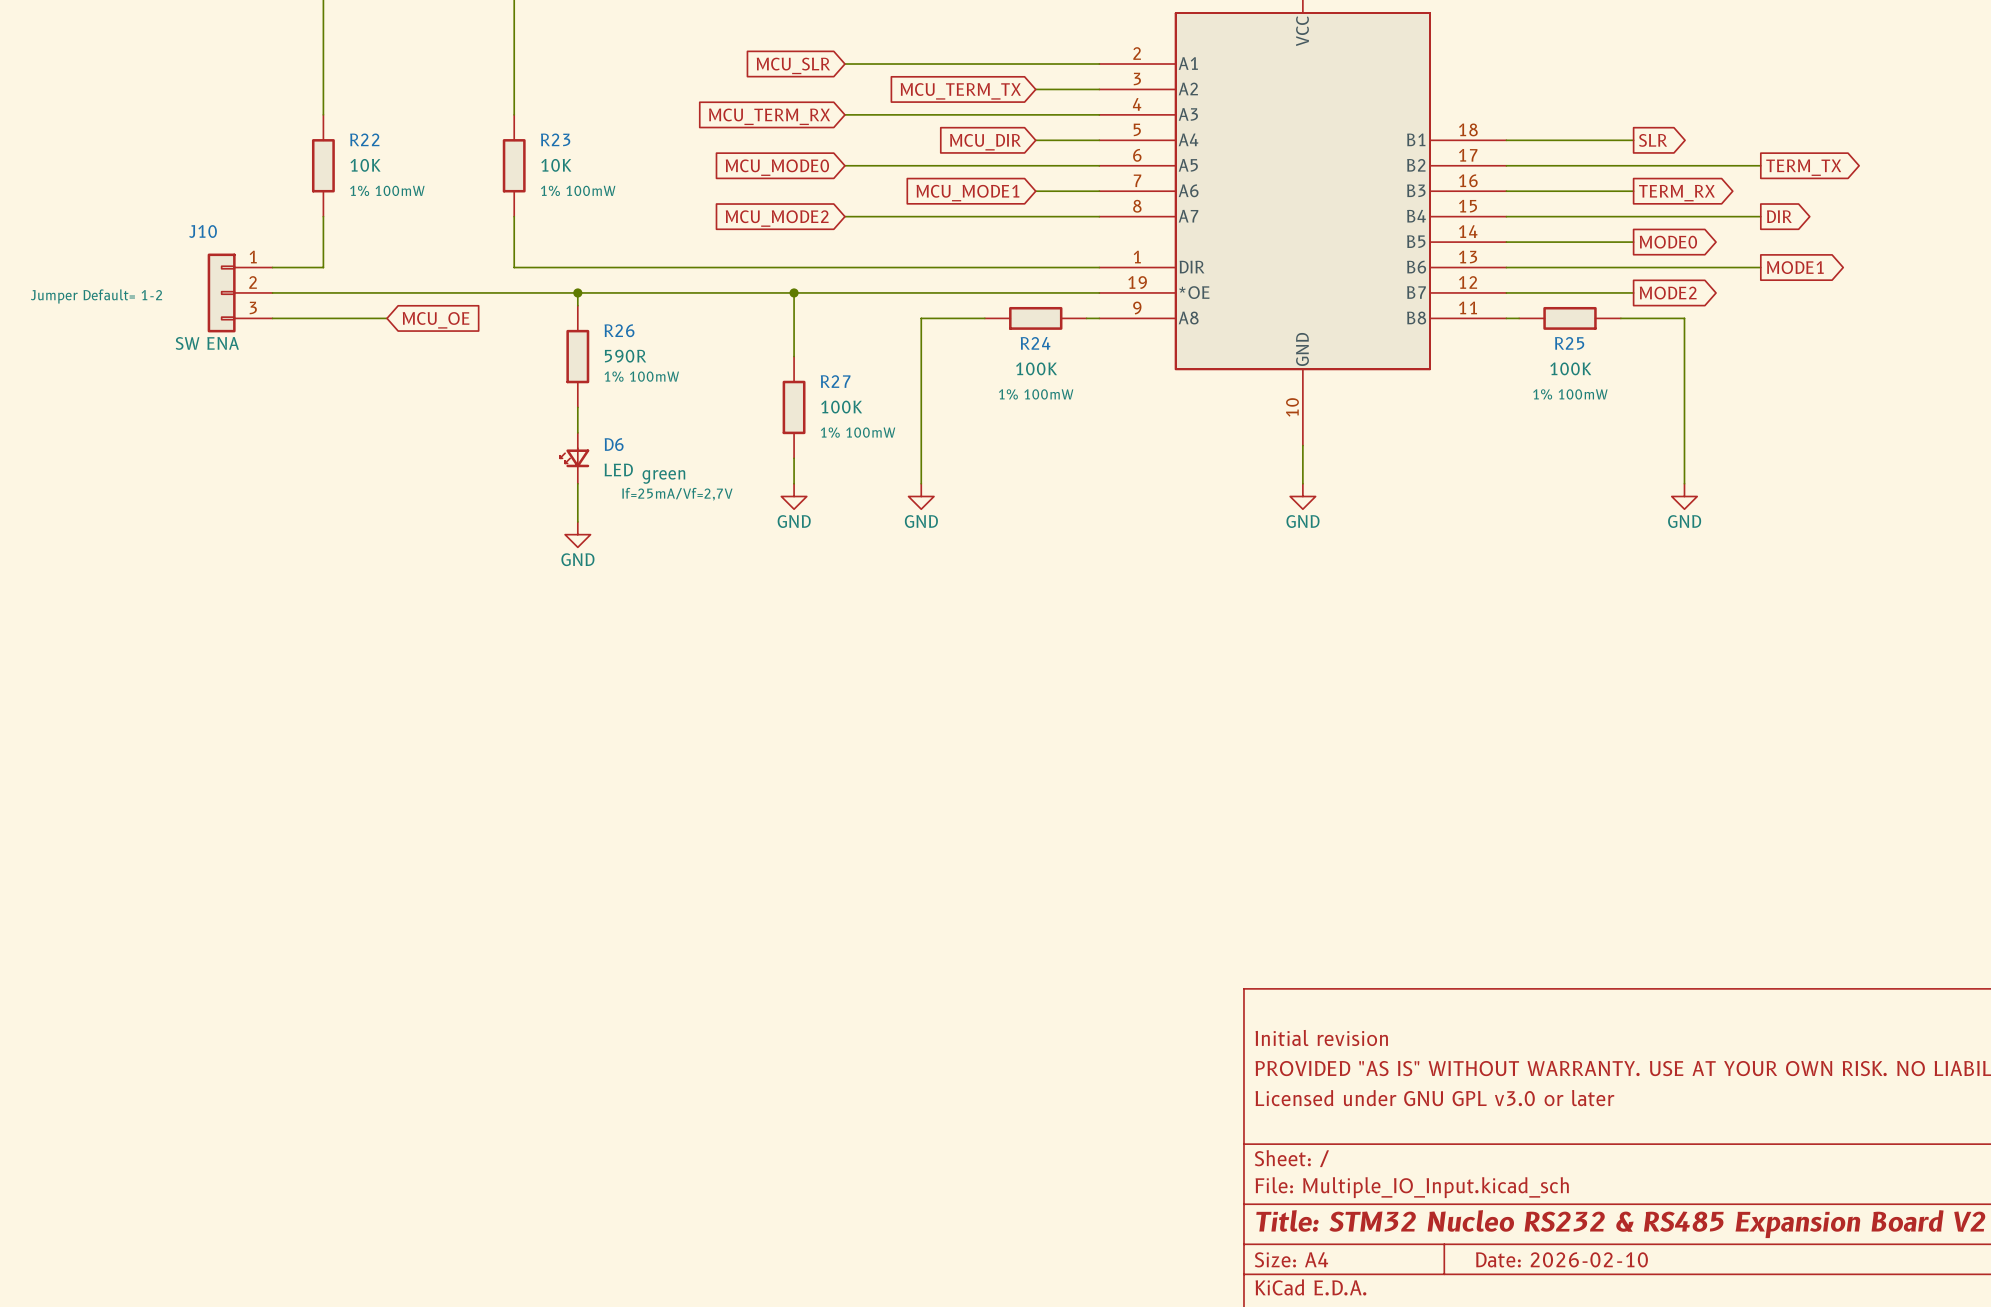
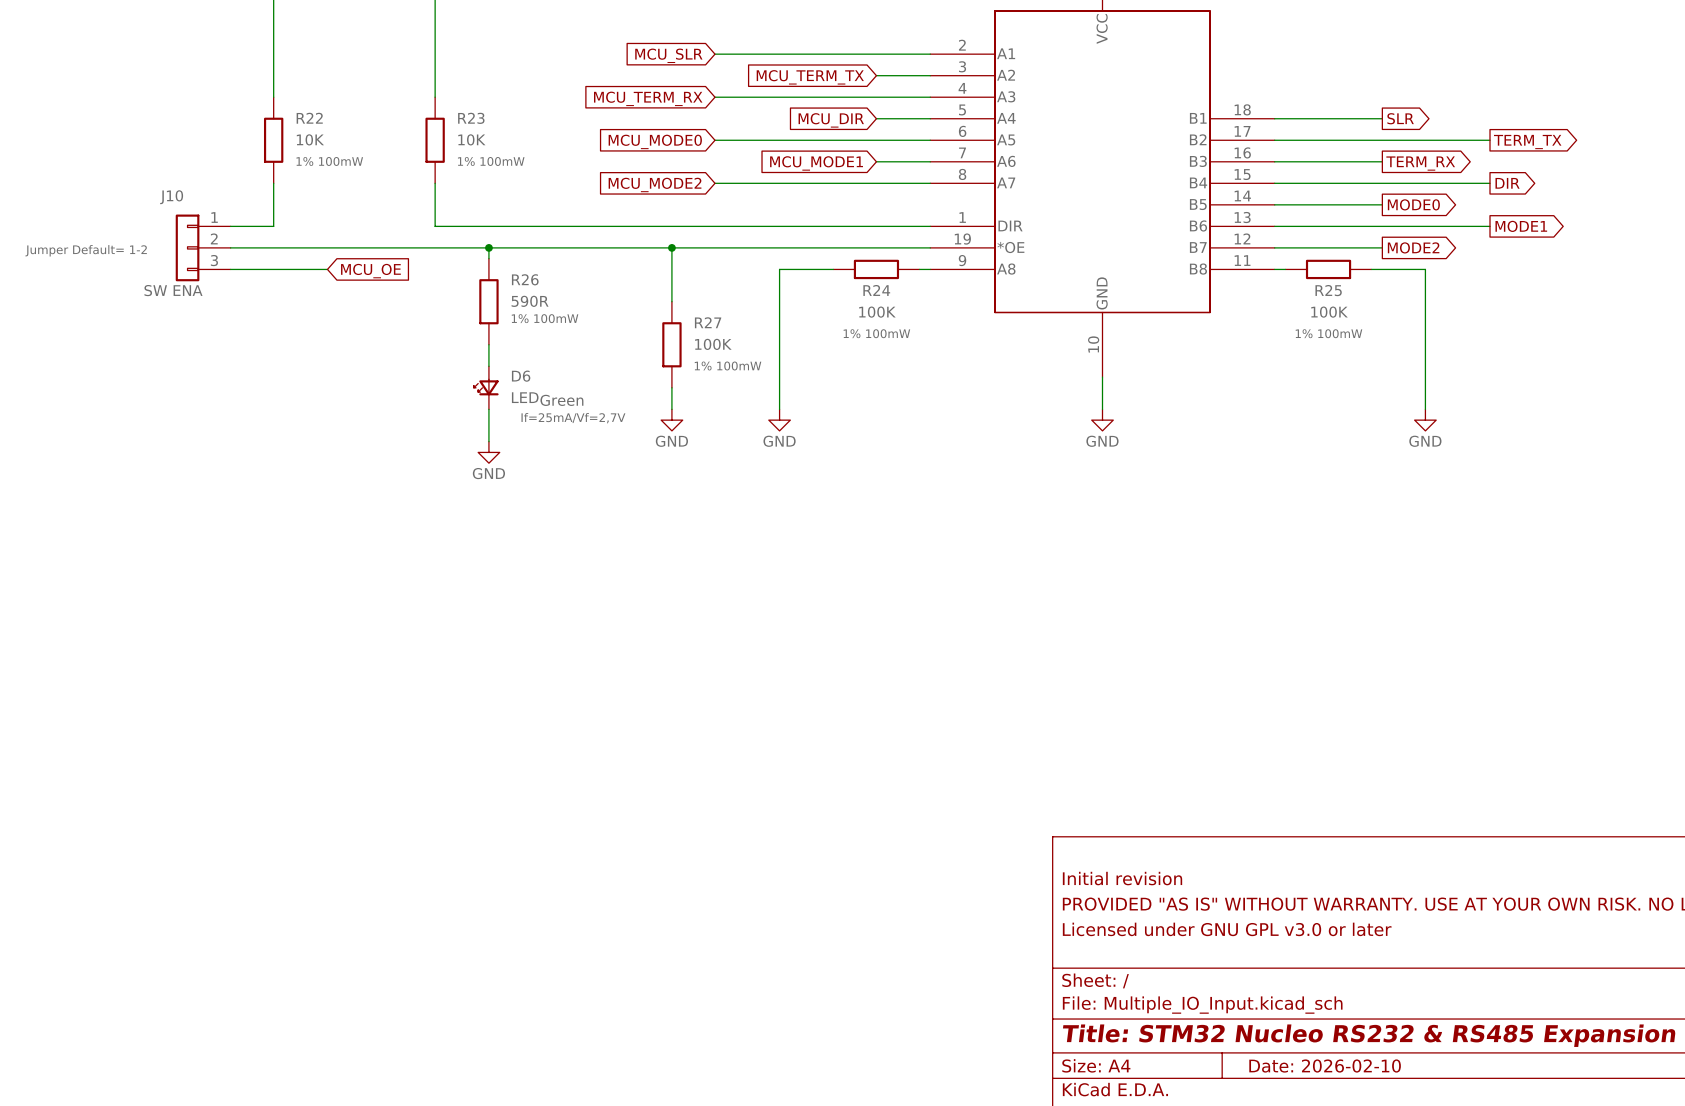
D6 text: green (663, 476) -> Green (561, 400)

